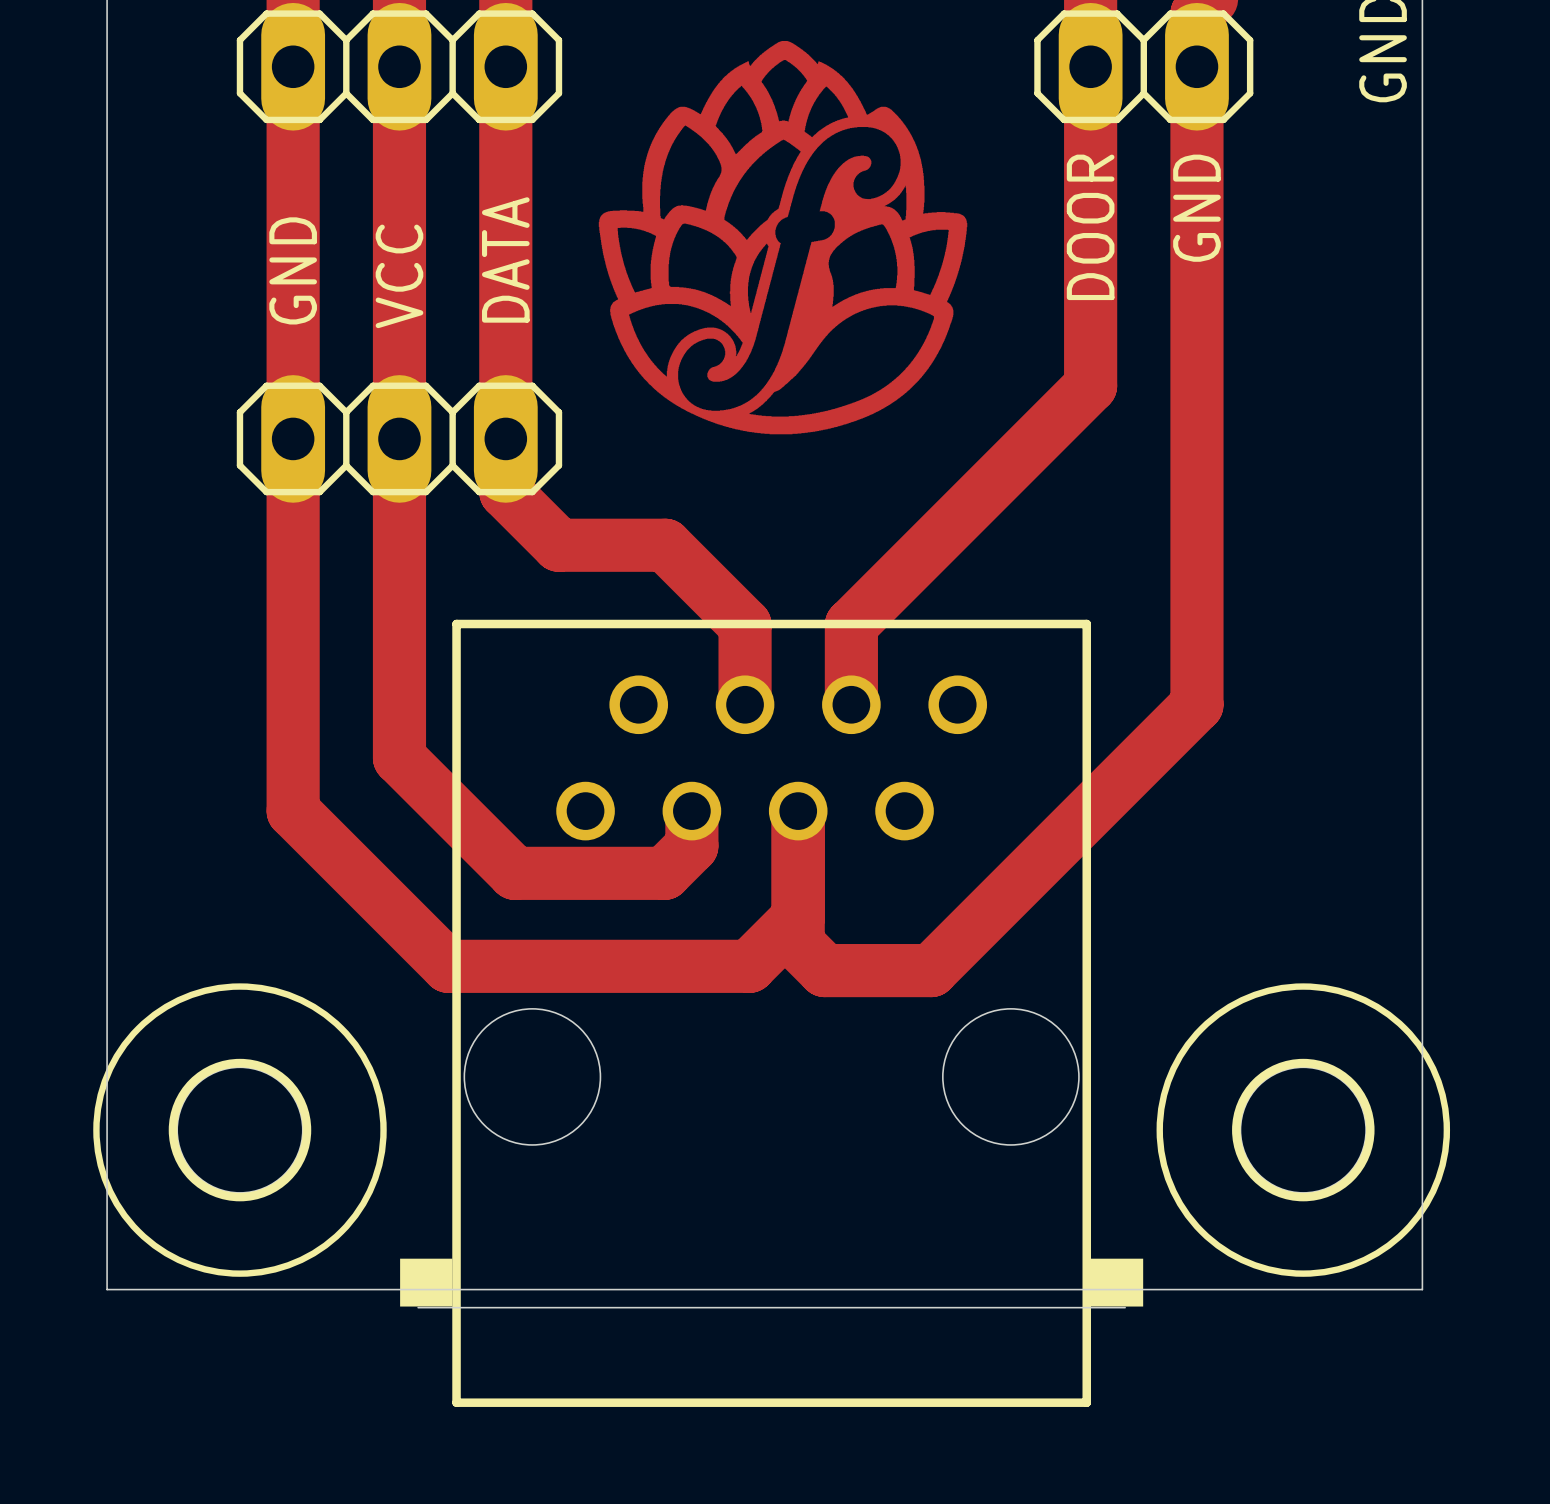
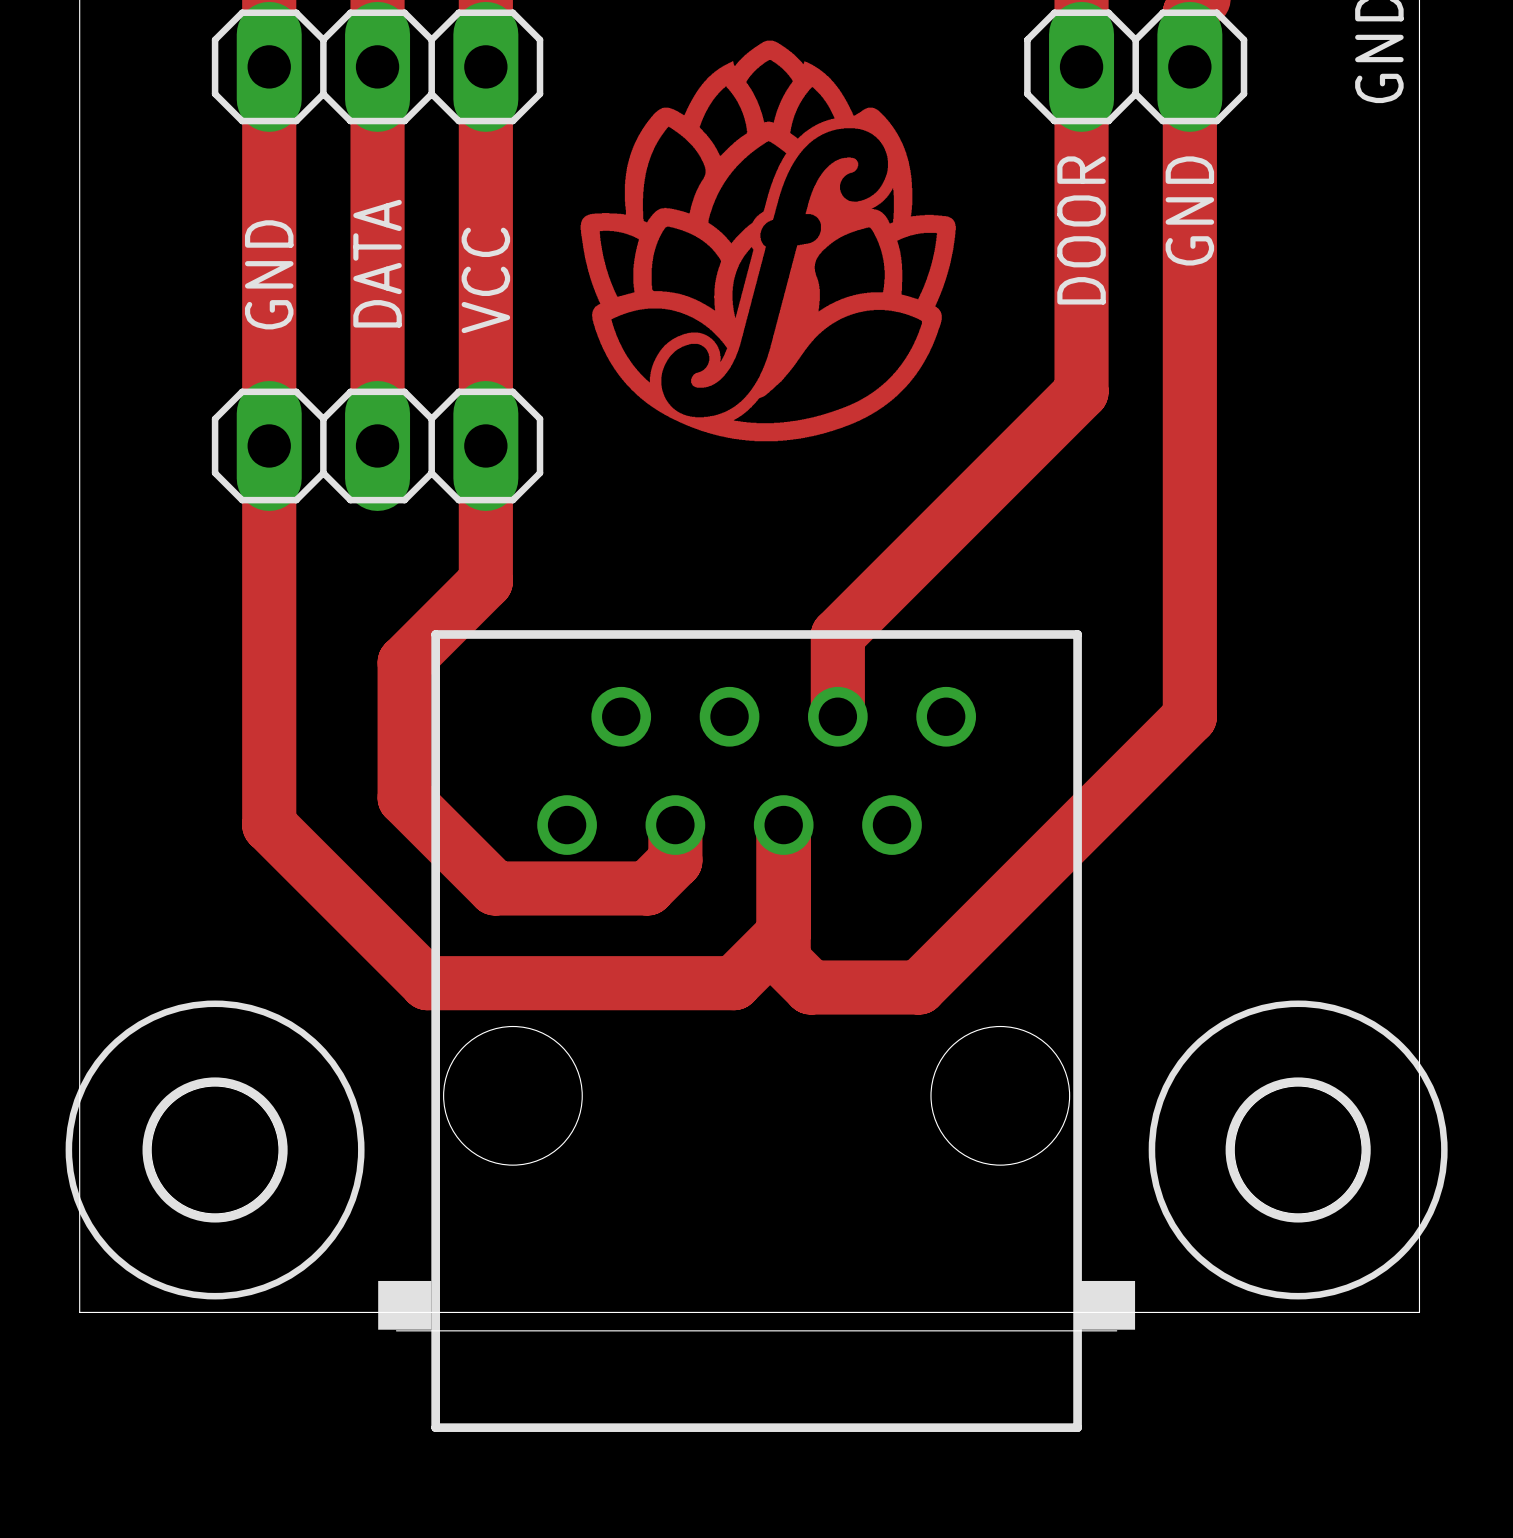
text: DATA (505, 259) -> VCC (485, 280)
text: VCC (399, 276) -> DATA (377, 263)
track: (399, 438) (399, 757) (426, 784) -> (485, 500) (485, 581) (404, 662) (404, 797)
track: (505, 492) (558, 545) (665, 545) (745, 625) (745, 704) -> none

